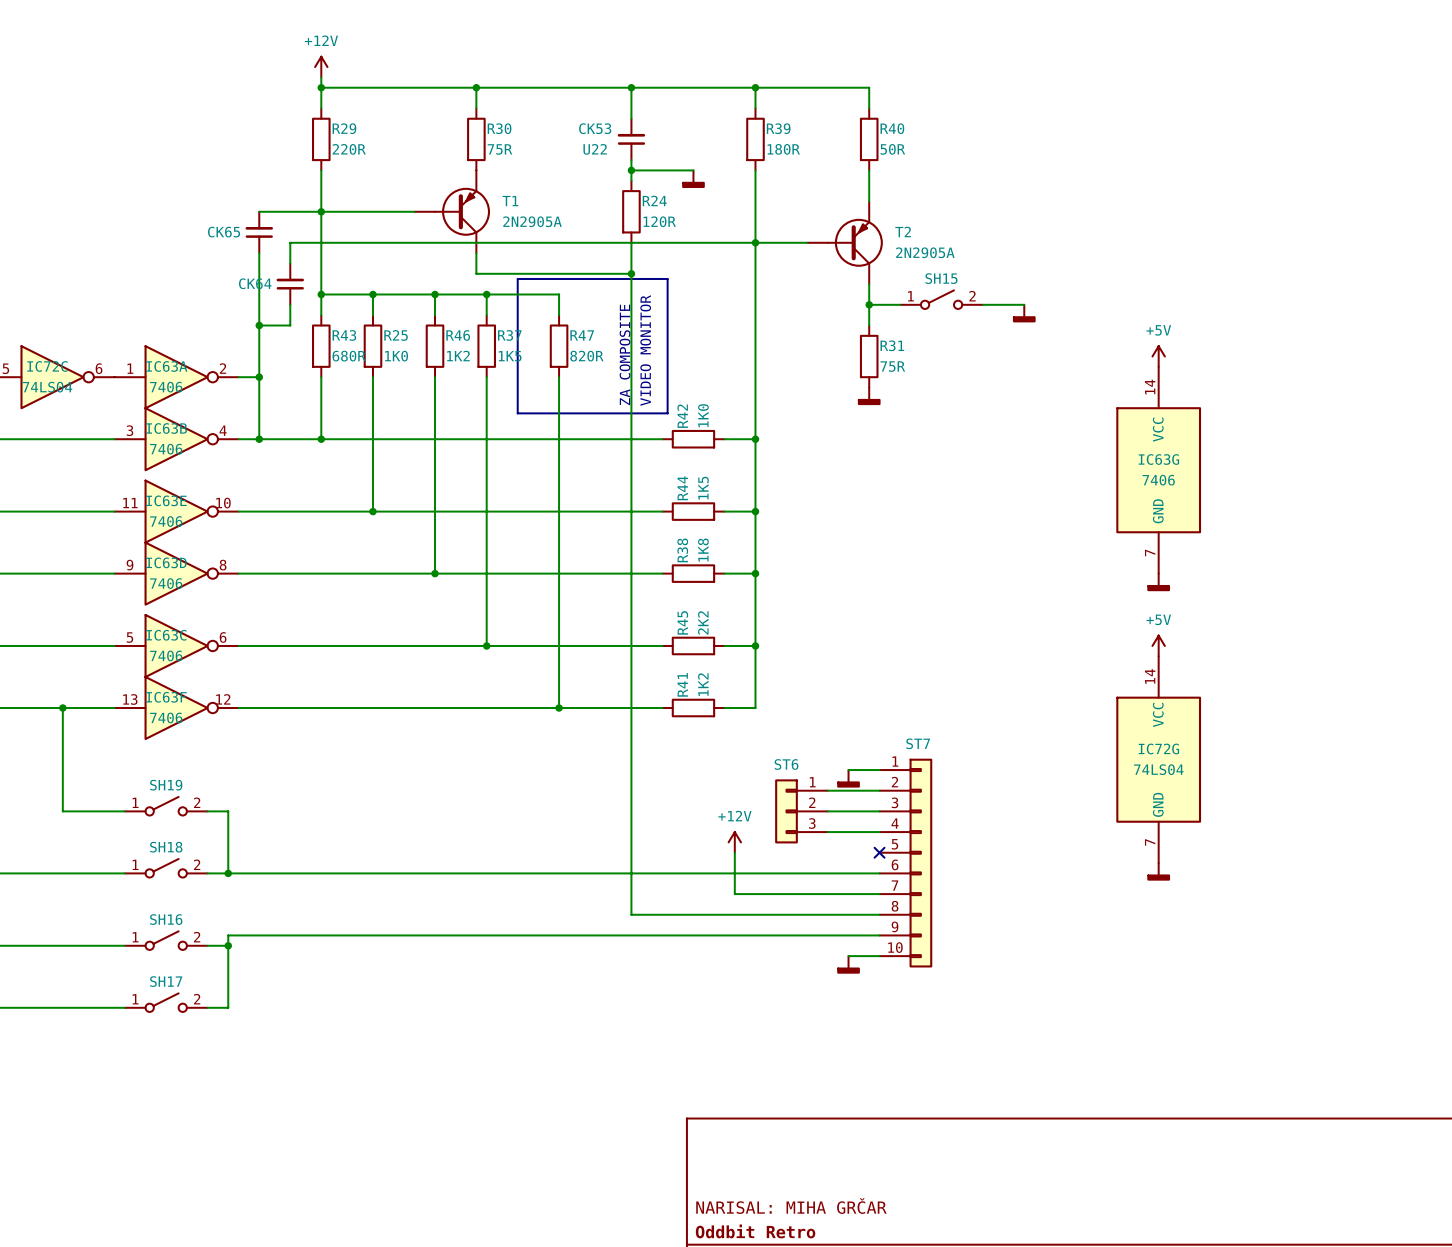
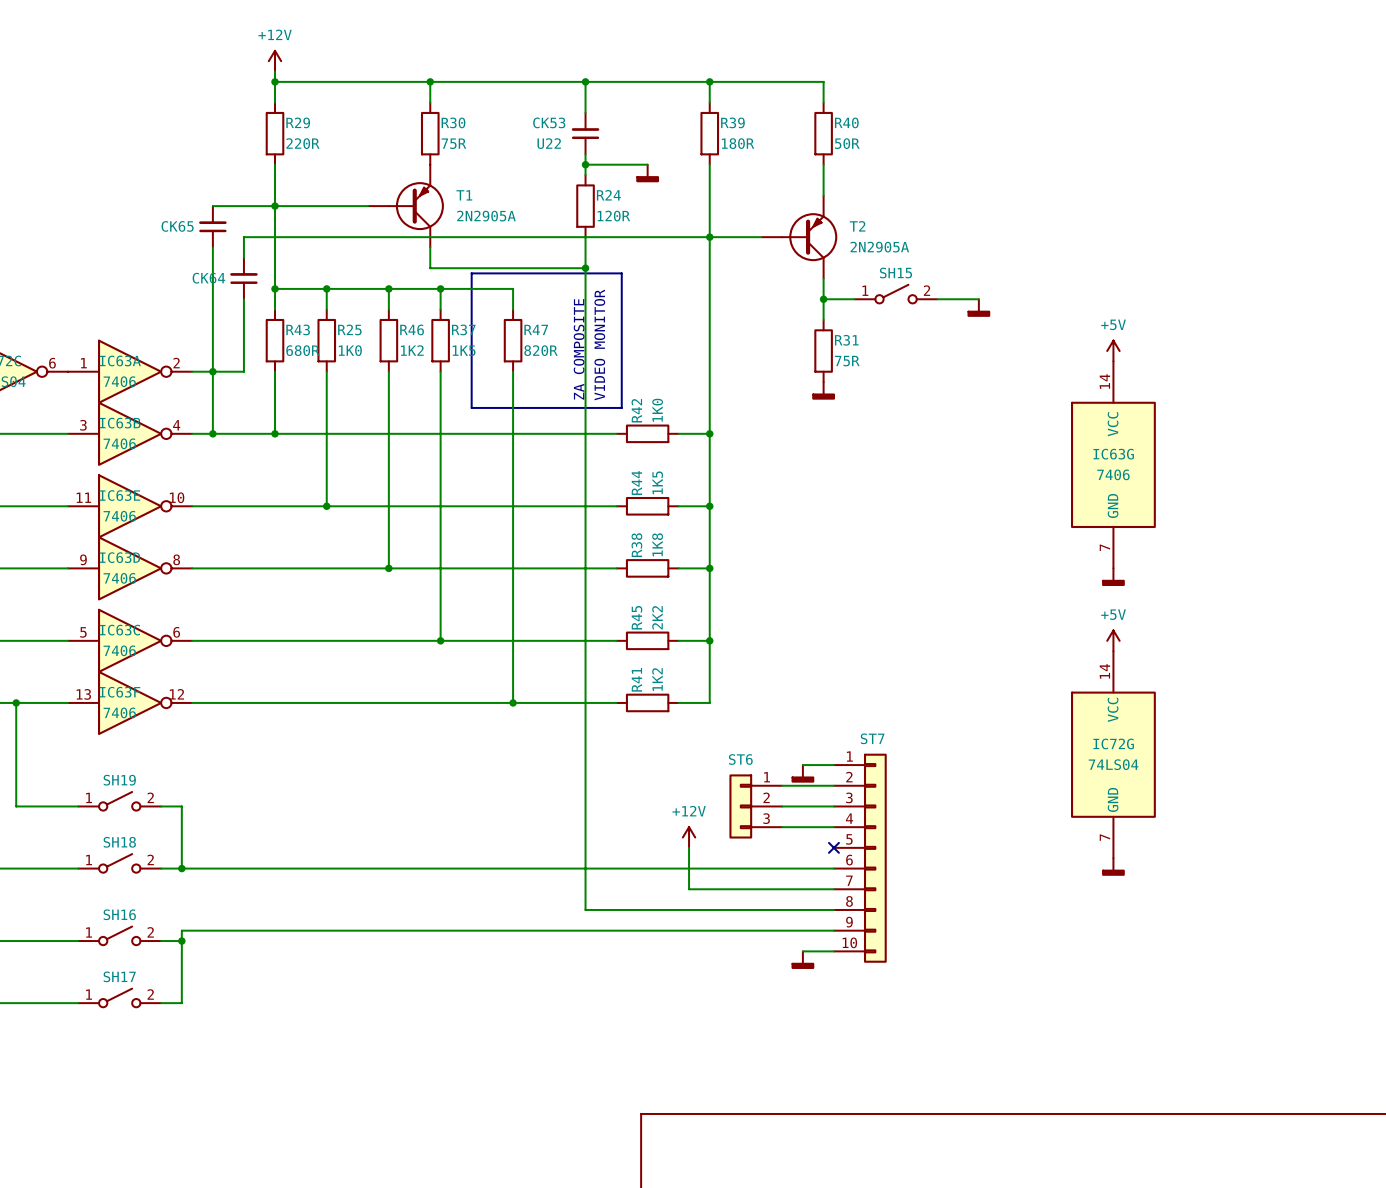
wire: (259, 325) (290, 325) -> (212, 371) (243, 371) (243, 319)
junction: (259, 325) -> none

